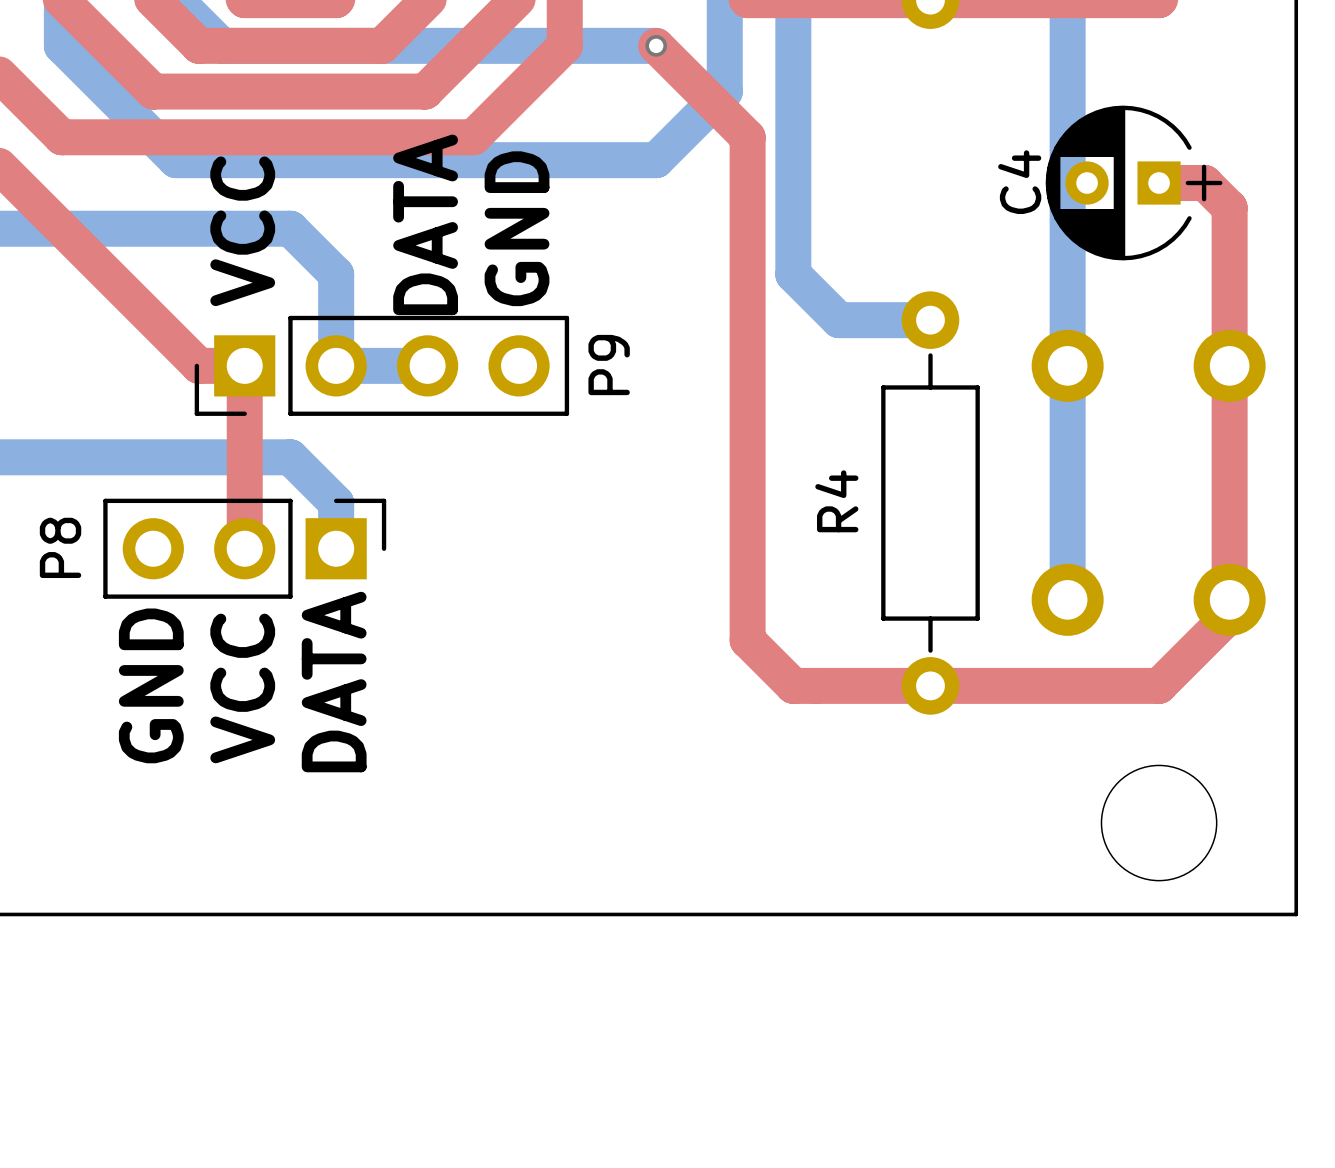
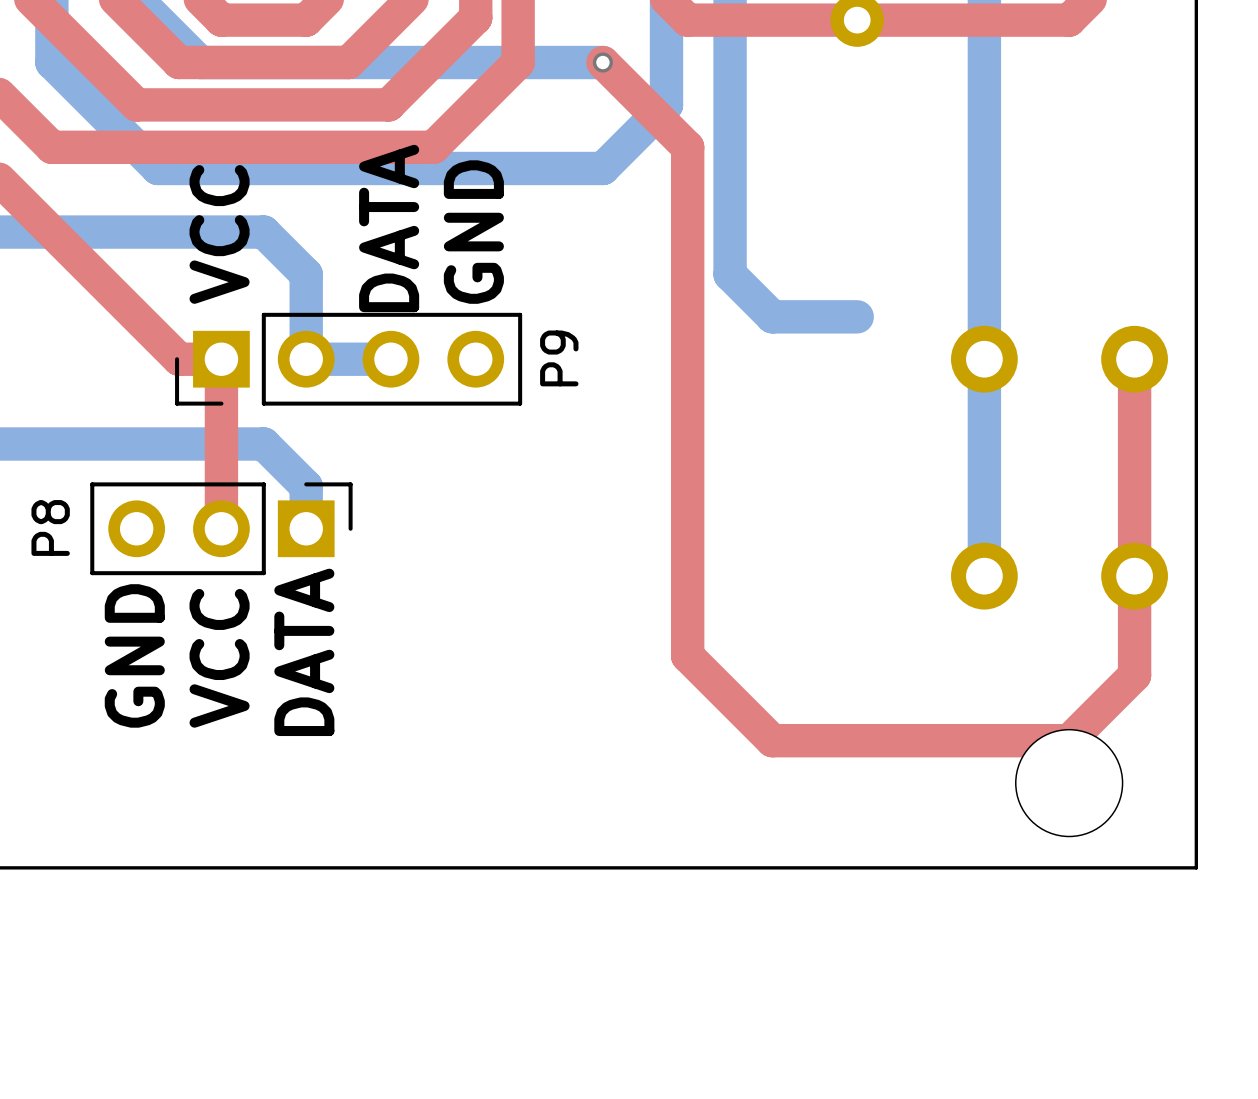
C4: (1134, 183) -> none
top track: (1159, 183) (1204, 183) (1229, 207) (1229, 365) -> none
R4: (930, 503) -> none
top track: (1229, 615) (1159, 685) (793, 685) (747, 640) -> (1134, 590) (1134, 675) (1069, 740) (772, 740) (687, 655) (687, 613)

